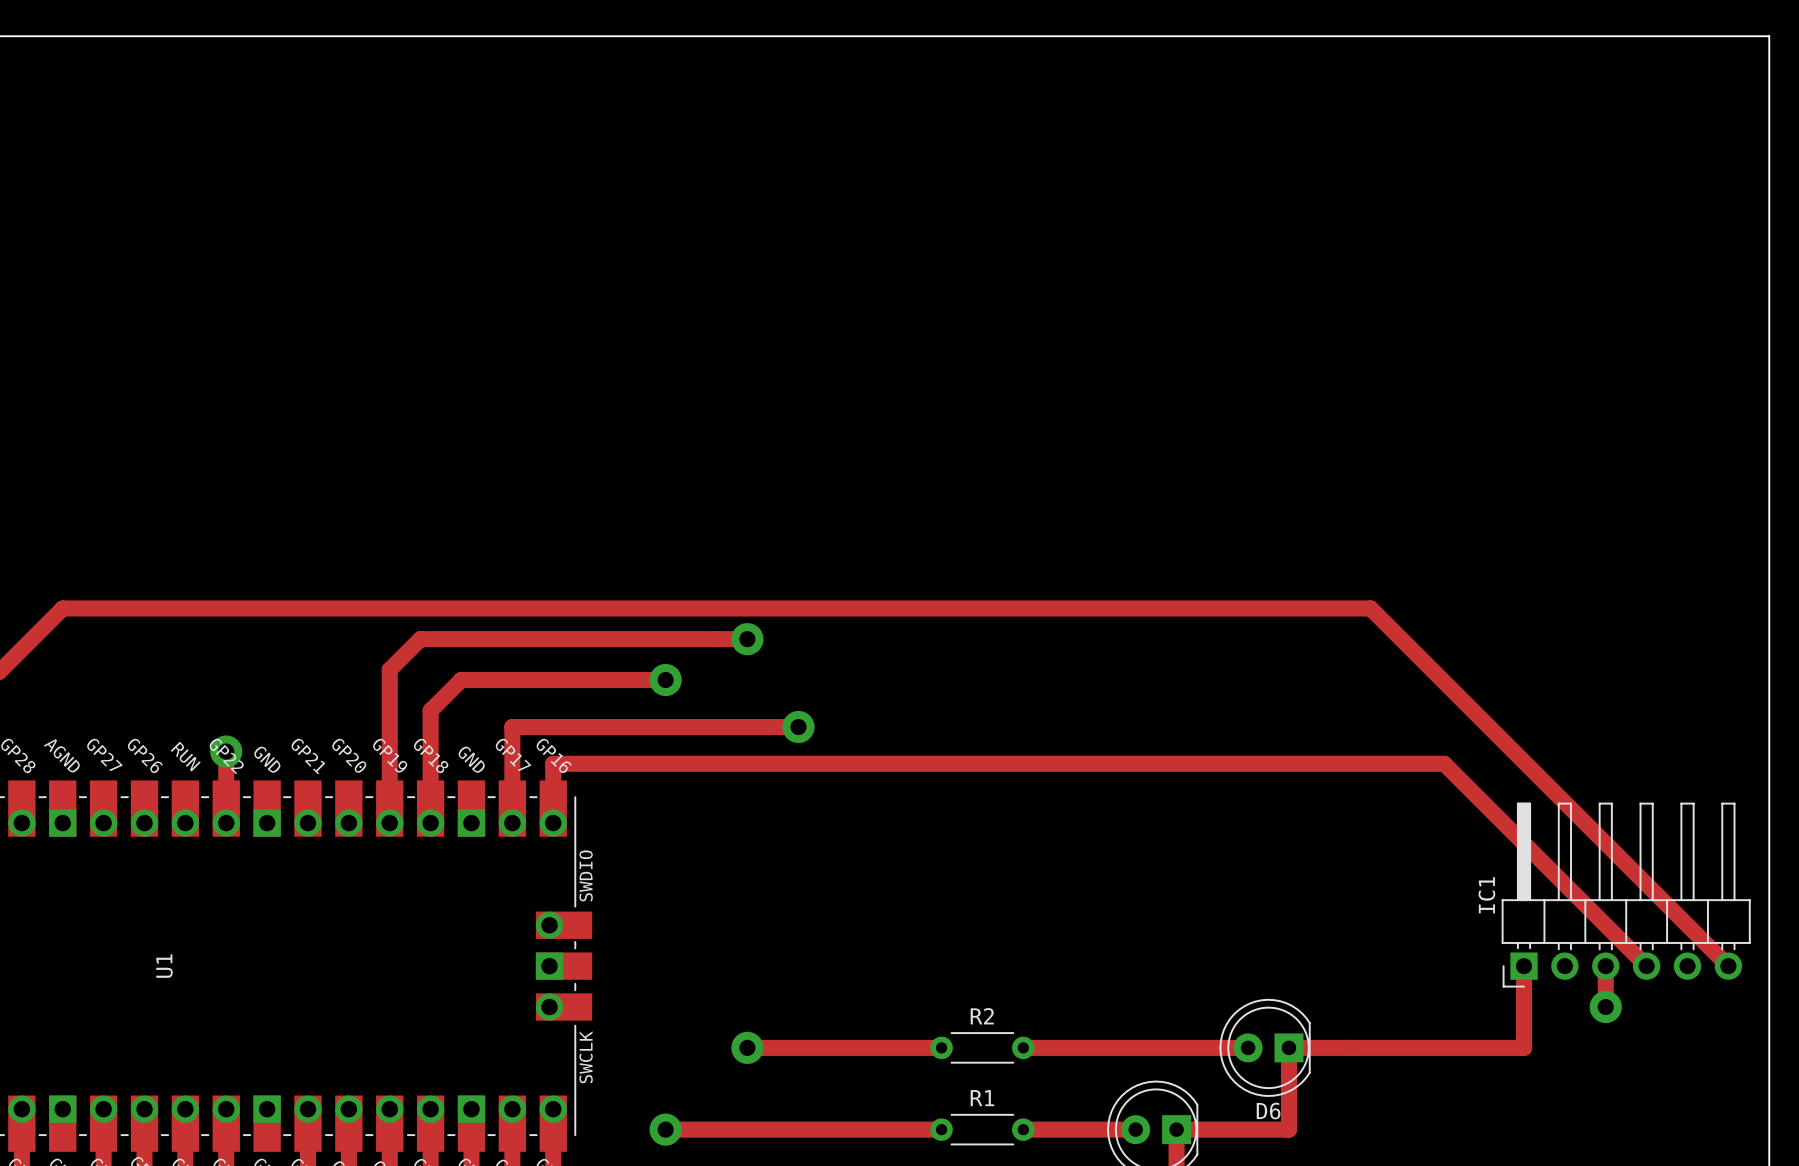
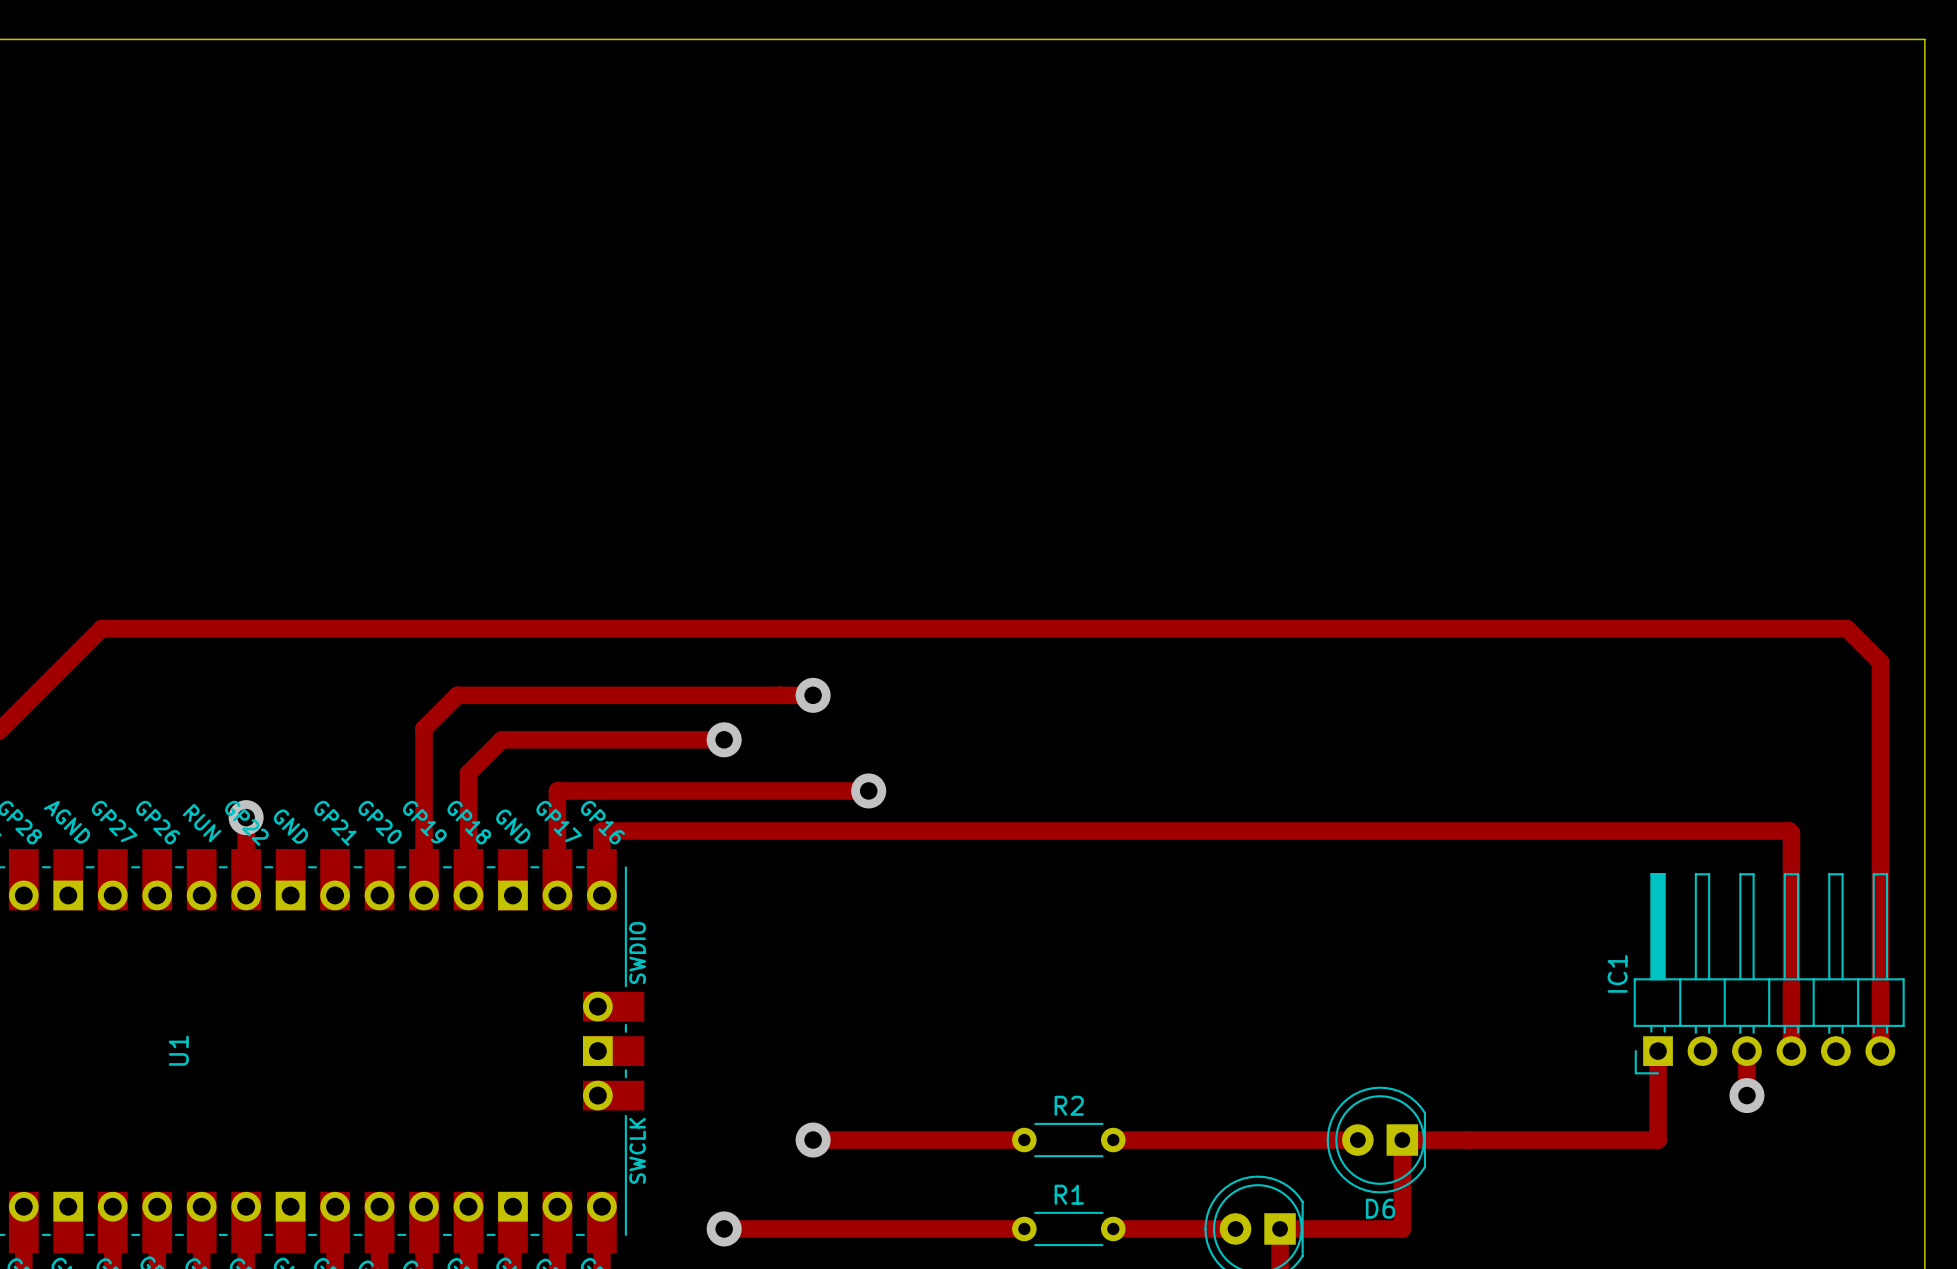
track: (62, 608) (1370, 608) (1728, 966) -> (68, 661) (101, 628) (1847, 628) (1880, 661) (1880, 1051)
track: (1444, 763) (1646, 966) -> (1571, 830) (1789, 830) (1791, 833) (1791, 1051)

